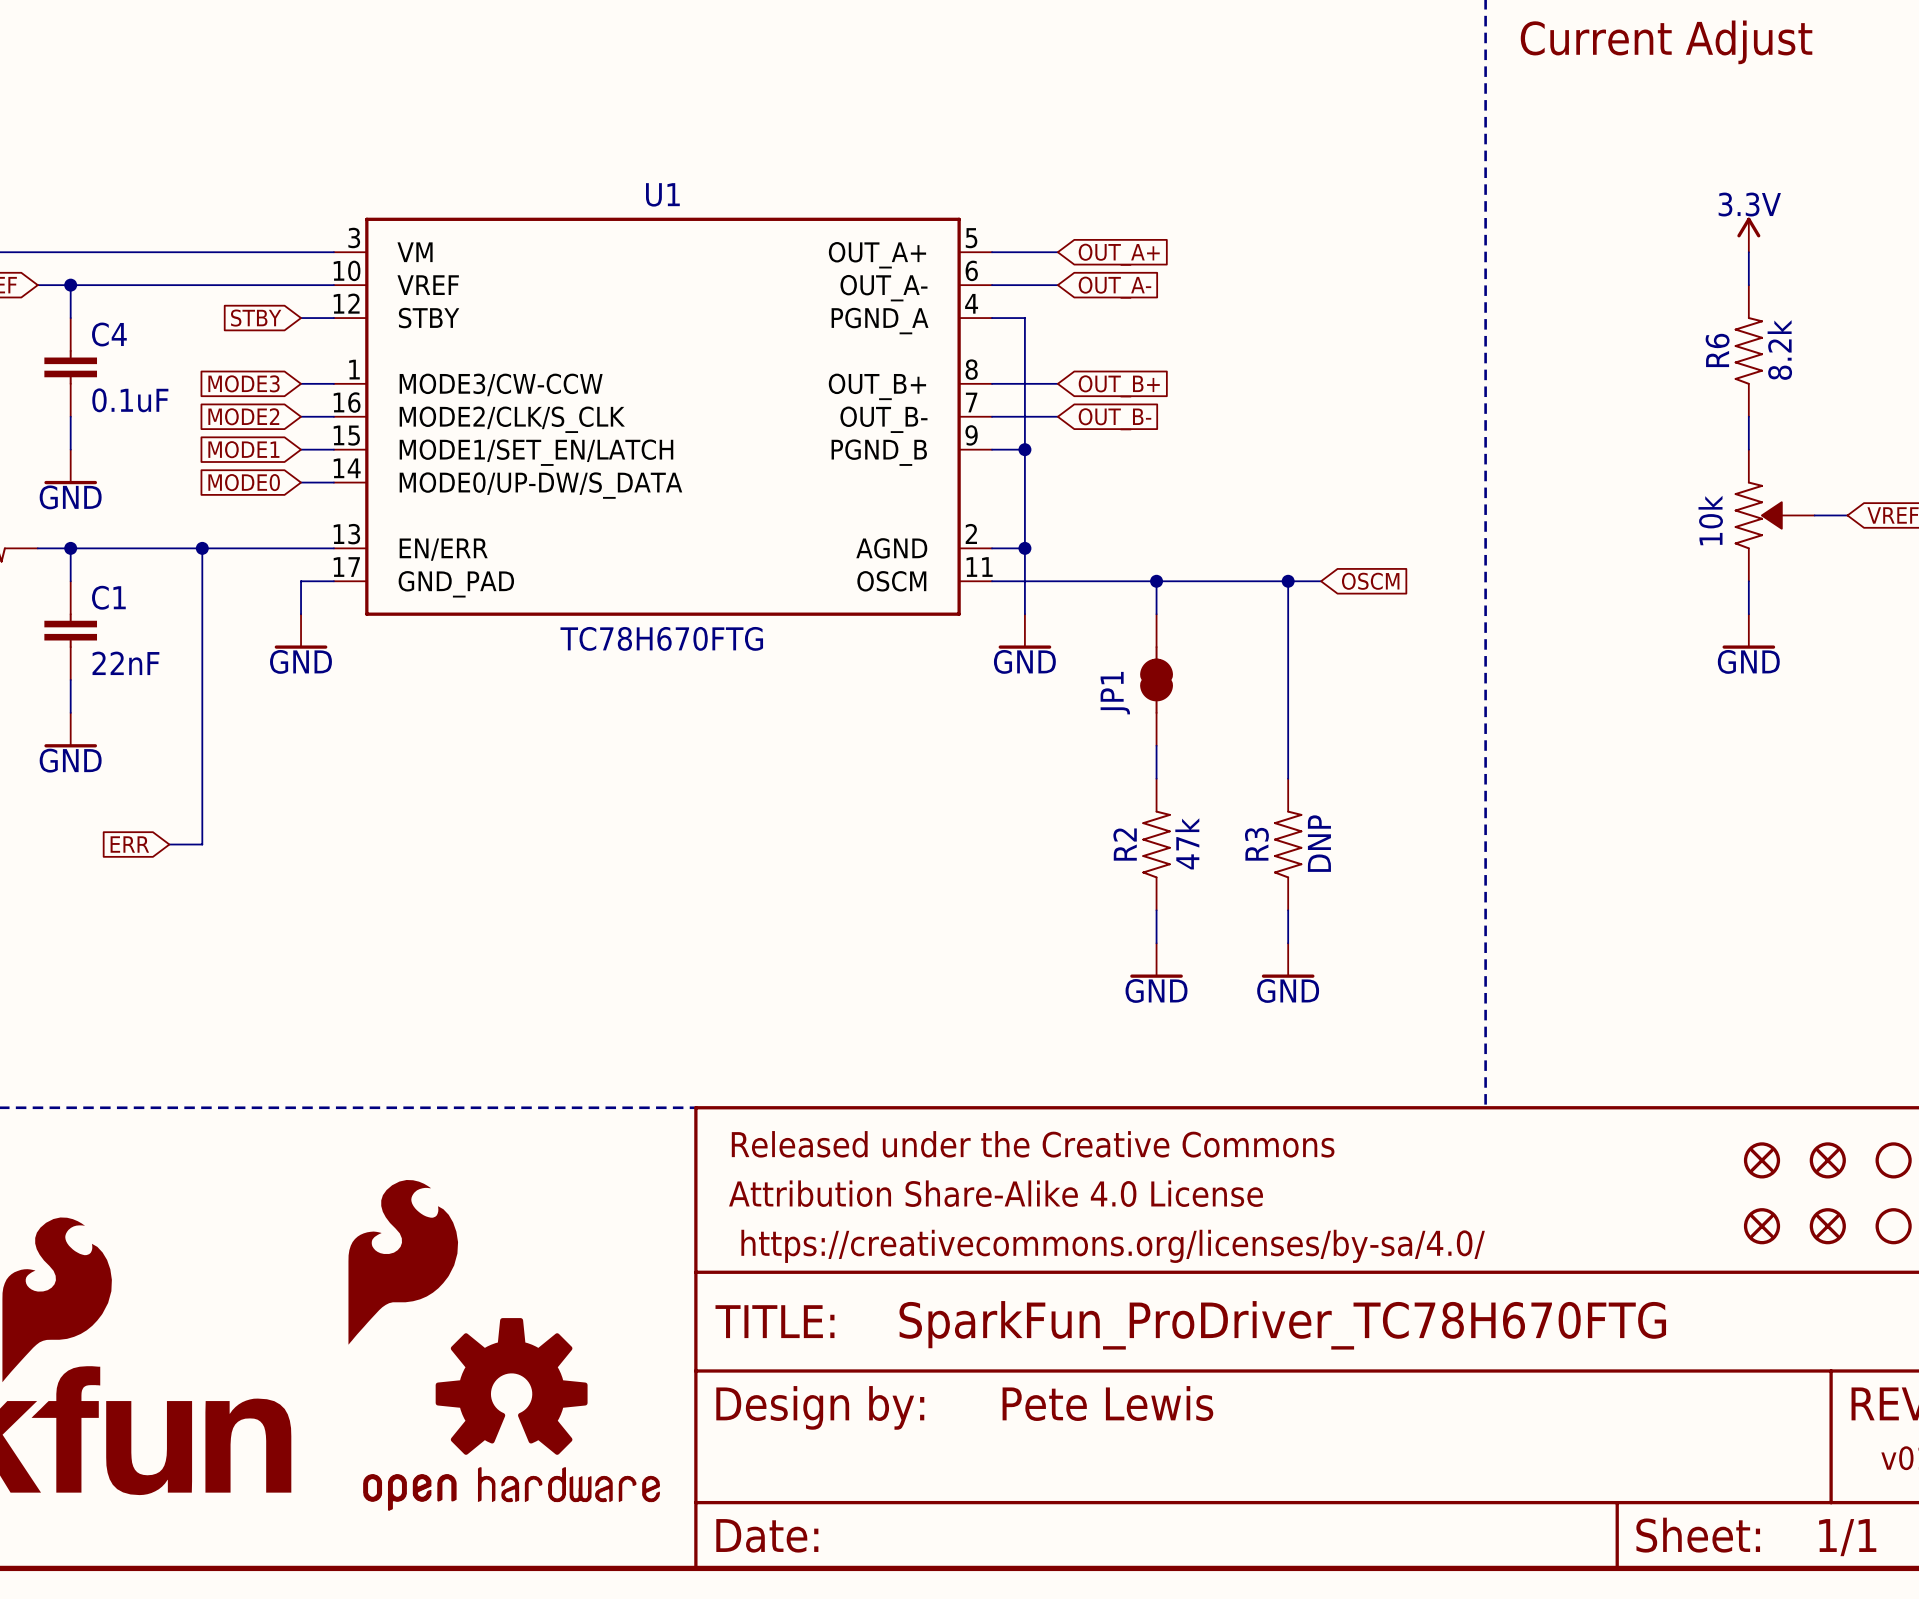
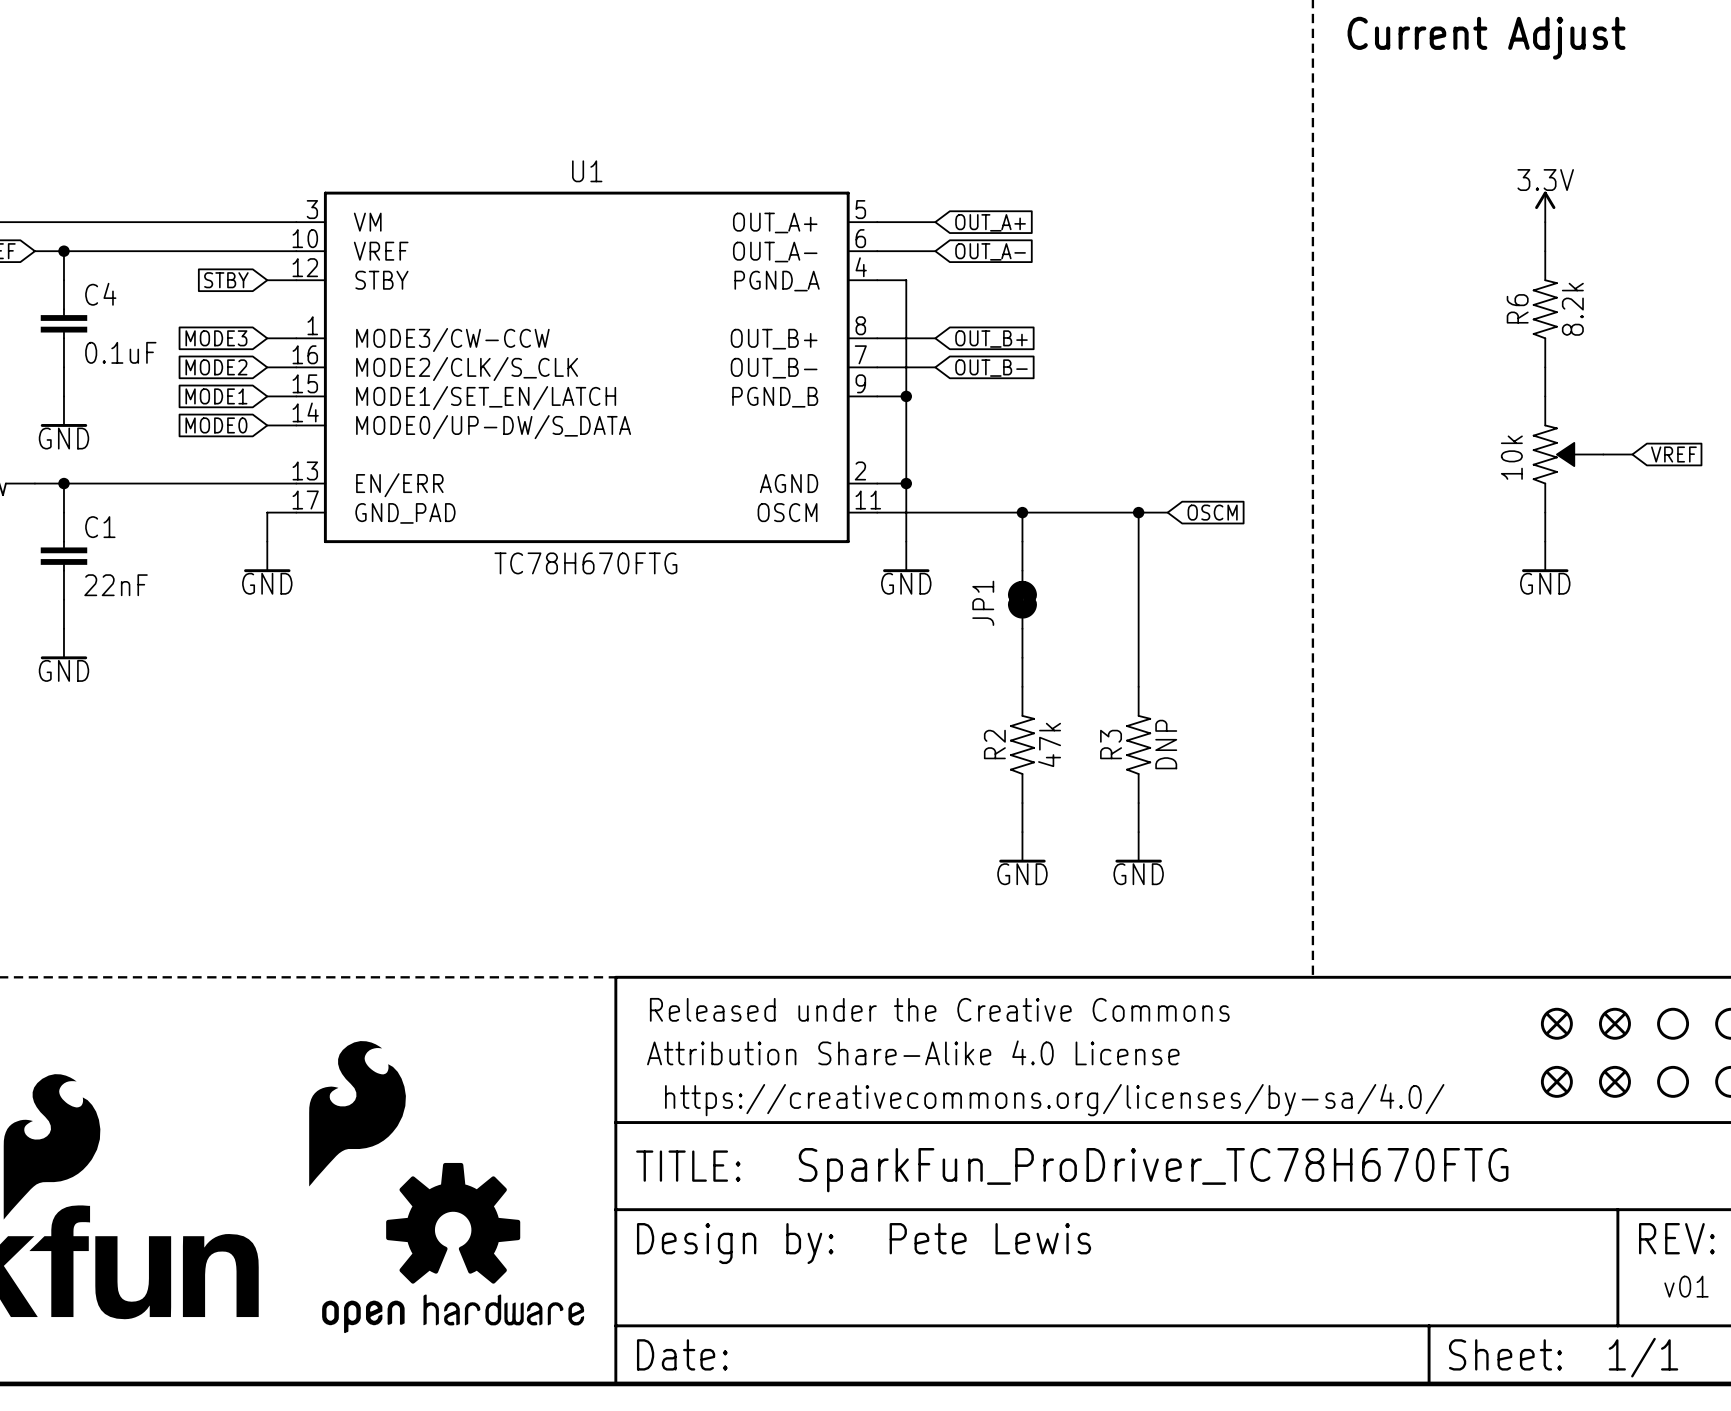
wire: (202, 548) (202, 844) (169, 844) -> none
junction: (202, 548) -> none
global label: ERR (129, 844) -> none

